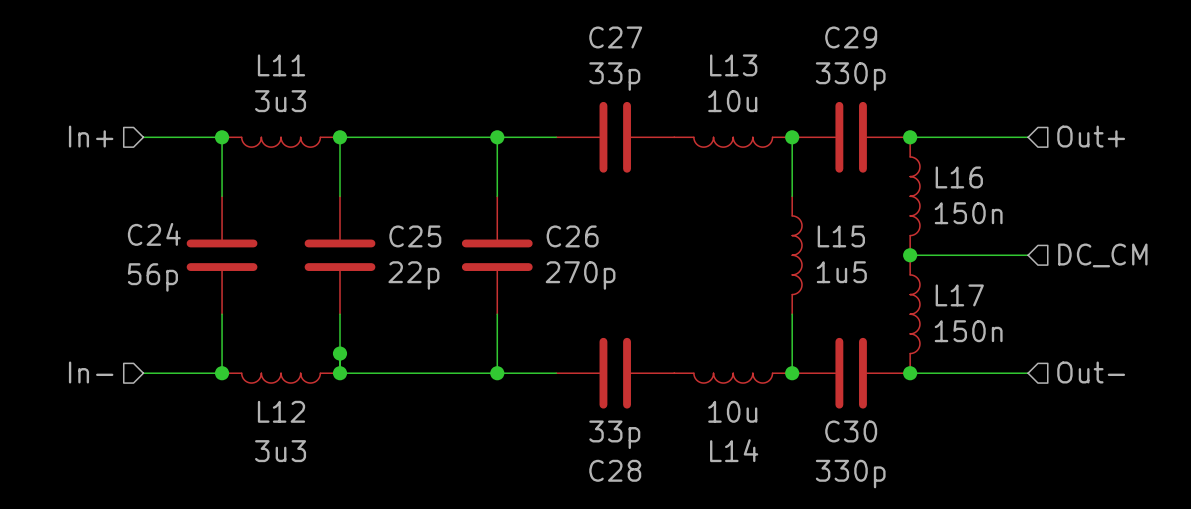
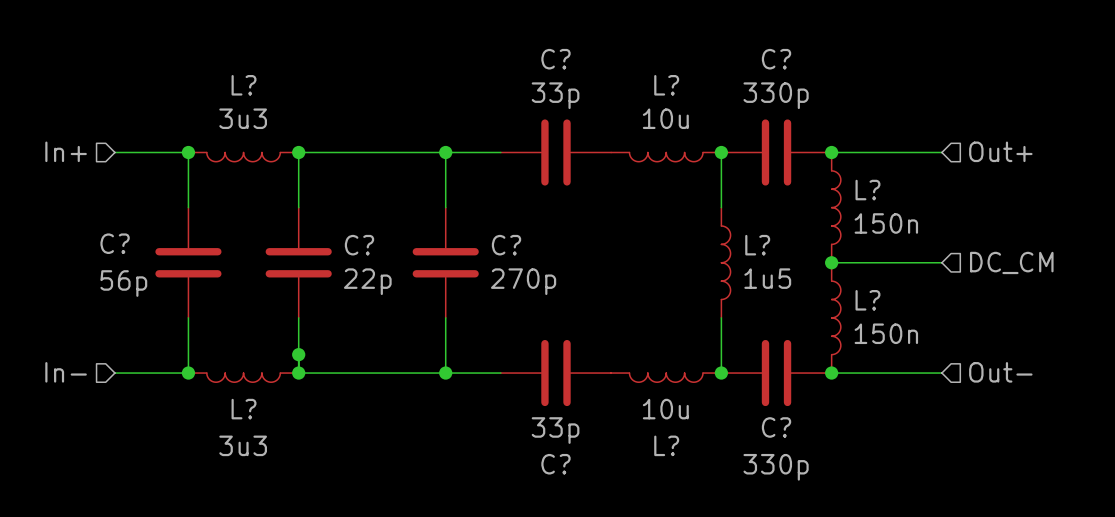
C27 name: C27 (615, 37) -> C? (555, 59)
C29 name: C29 (851, 37) -> C? (776, 59)
L11 name: L11 (281, 65) -> L? (244, 85)
L13 name: L13 (733, 65) -> L? (666, 85)
L16 name: L16 (959, 177) -> L? (867, 190)
C24 name: C24 (154, 234) -> C? (115, 243)
C25 name: C25 (415, 236) -> C? (359, 245)
C26 name: C26 (572, 236) -> C? (506, 245)
L15 name: L15 (841, 236) -> L? (757, 245)
L17 name: L17 (959, 295) -> L? (867, 300)
L12 name: L12 (281, 411) -> L? (244, 409)
C30 name: C30 (851, 431) -> C? (776, 427)
L14 name: L14 (734, 450) -> L? (666, 445)
C28 name: C28 (615, 470) -> C? (555, 464)

